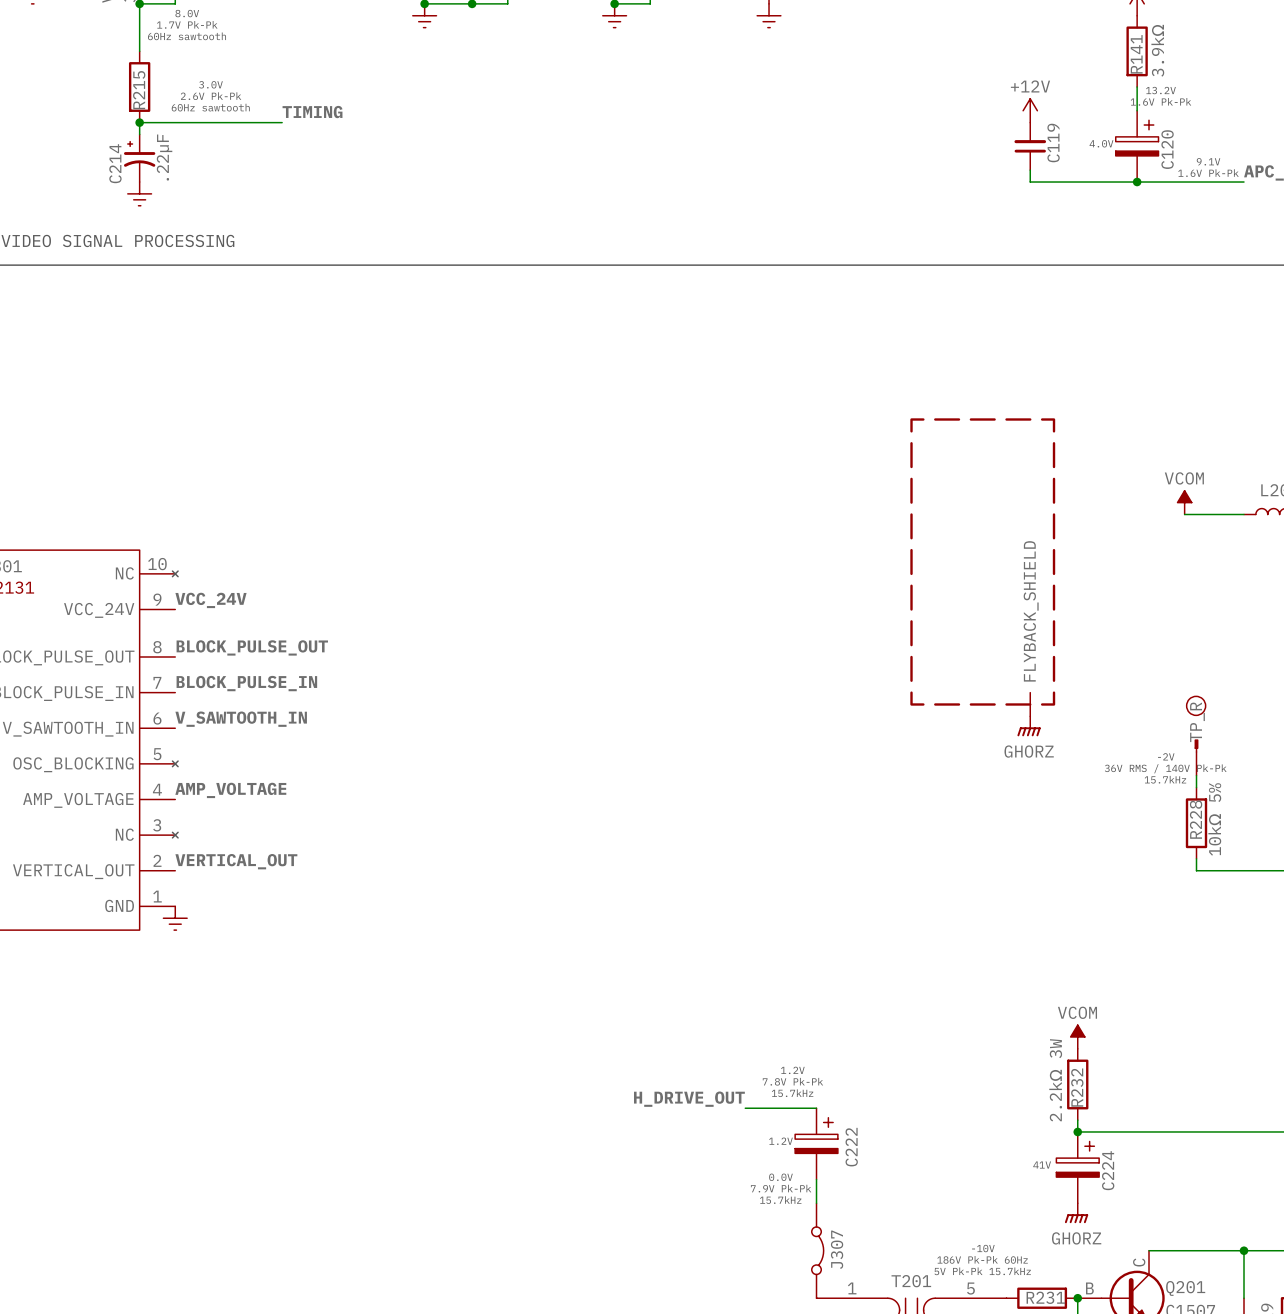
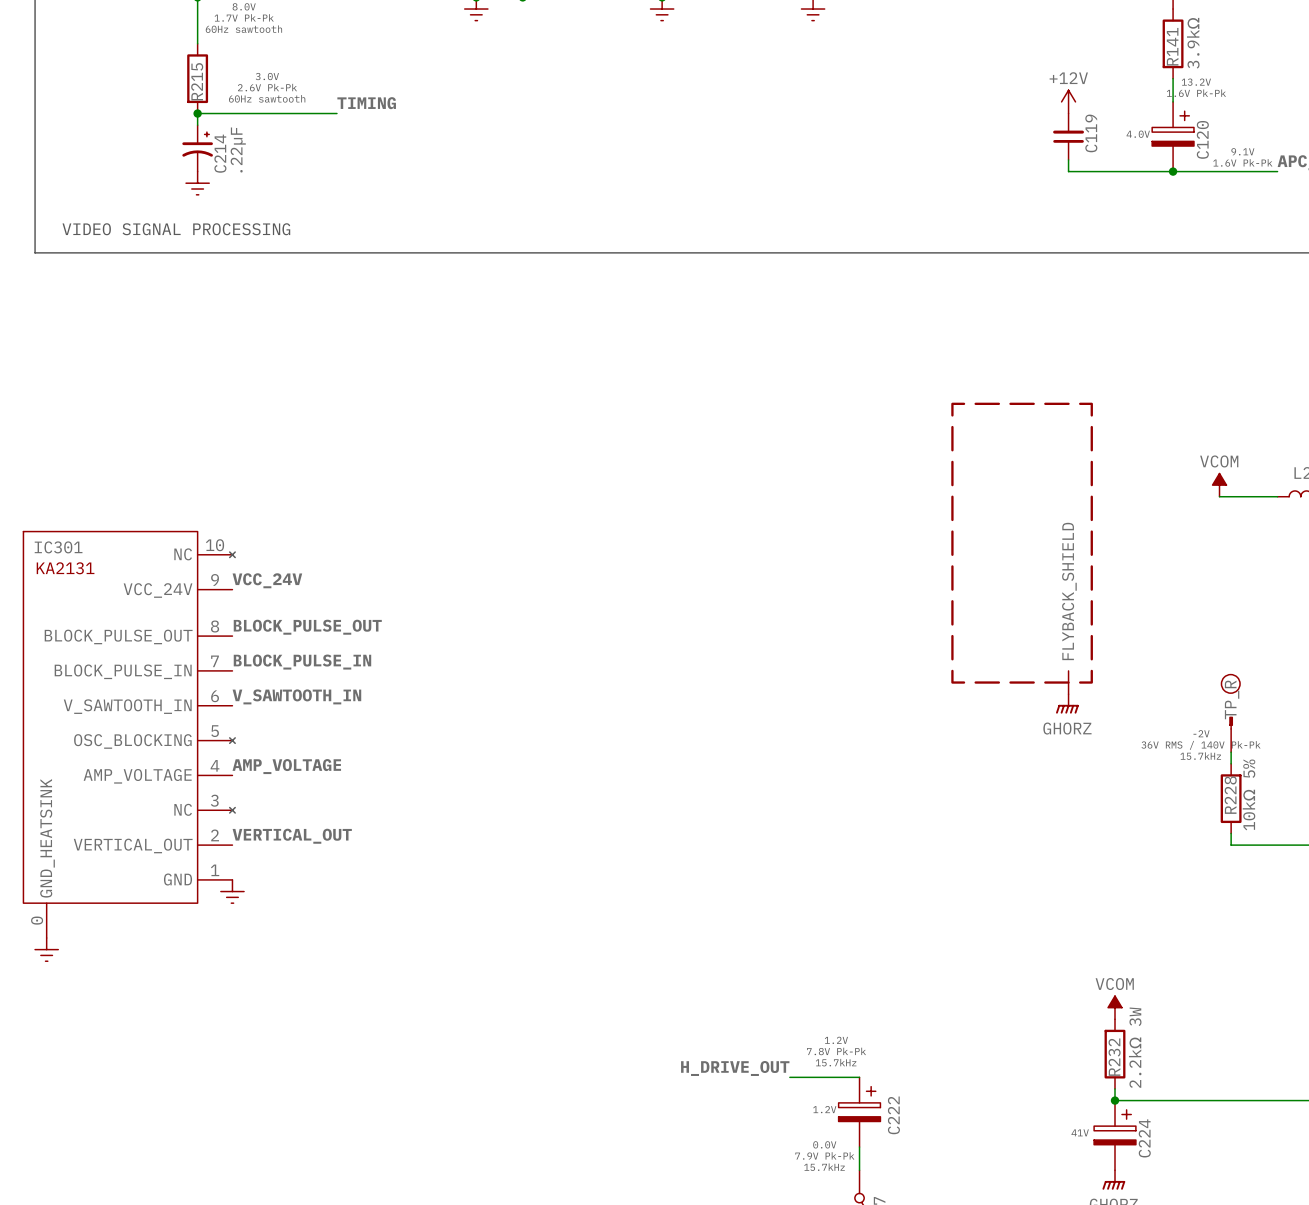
C214 flip: as is (139, 154) -> left-right (197, 144)
R232 value position: 2.2kΩ 3W (1055, 1080) -> 2.2kΩ 3W (1135, 1047)

